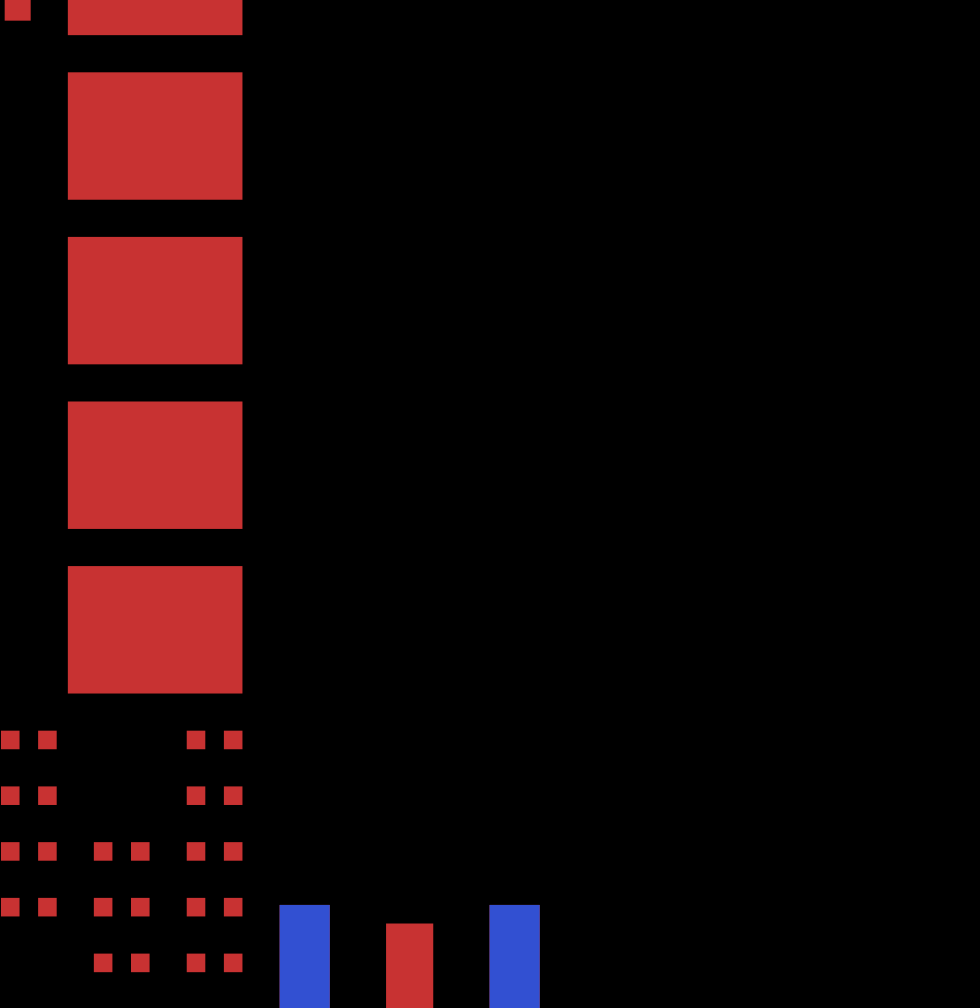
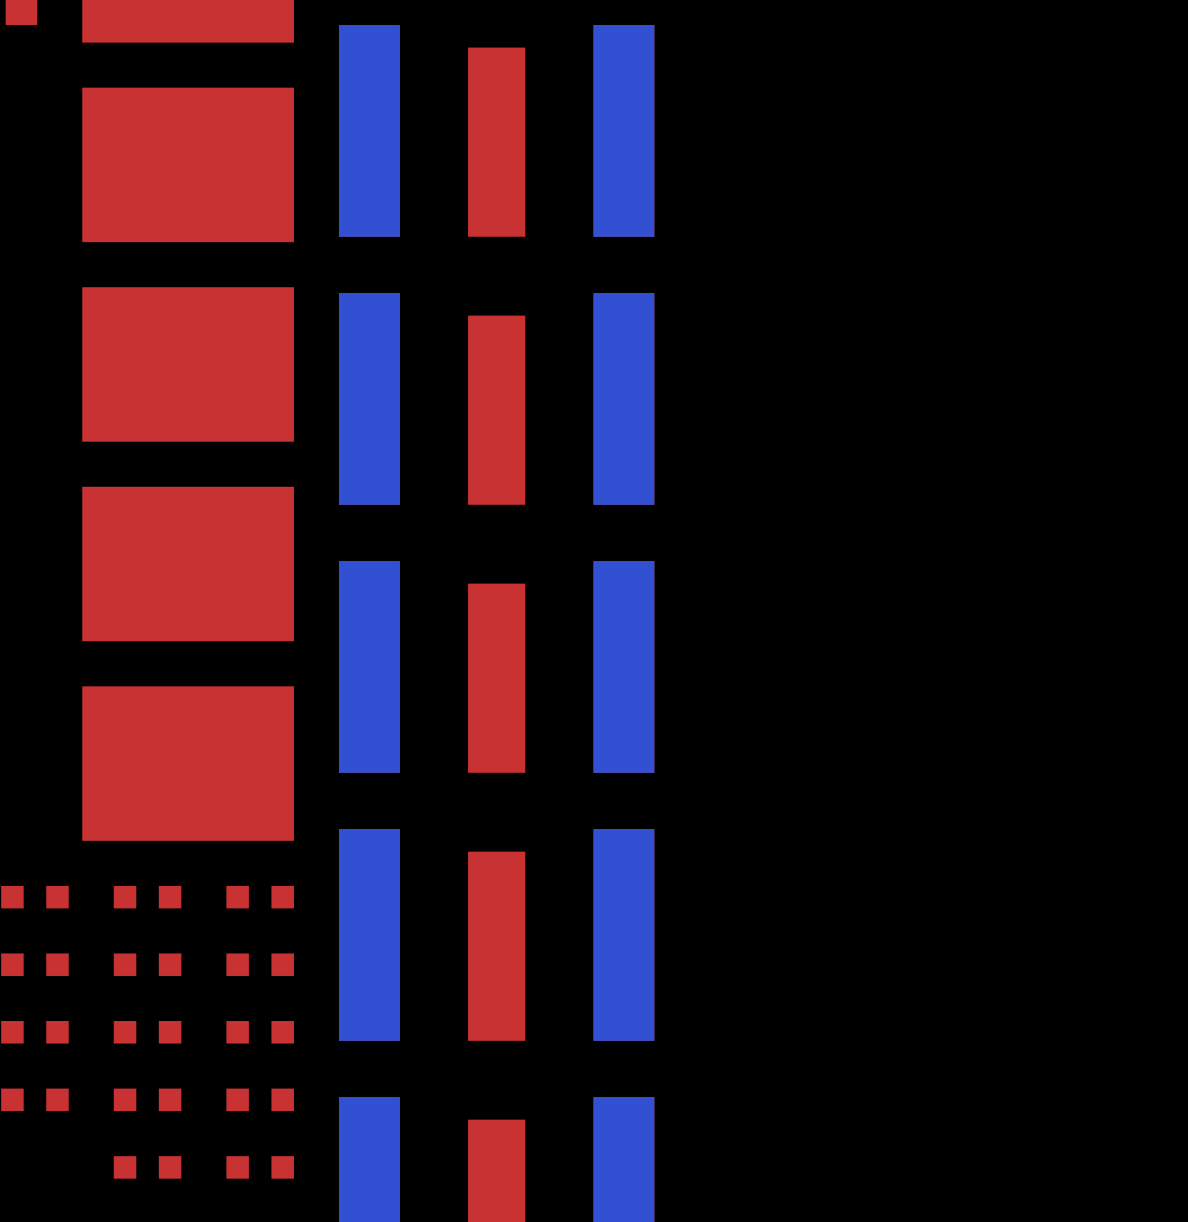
part: none -> (496, 130)
part: none -> (496, 398)
part: none -> (496, 666)
part: none -> (147, 897)
part: none -> (496, 934)
part: none -> (147, 964)

